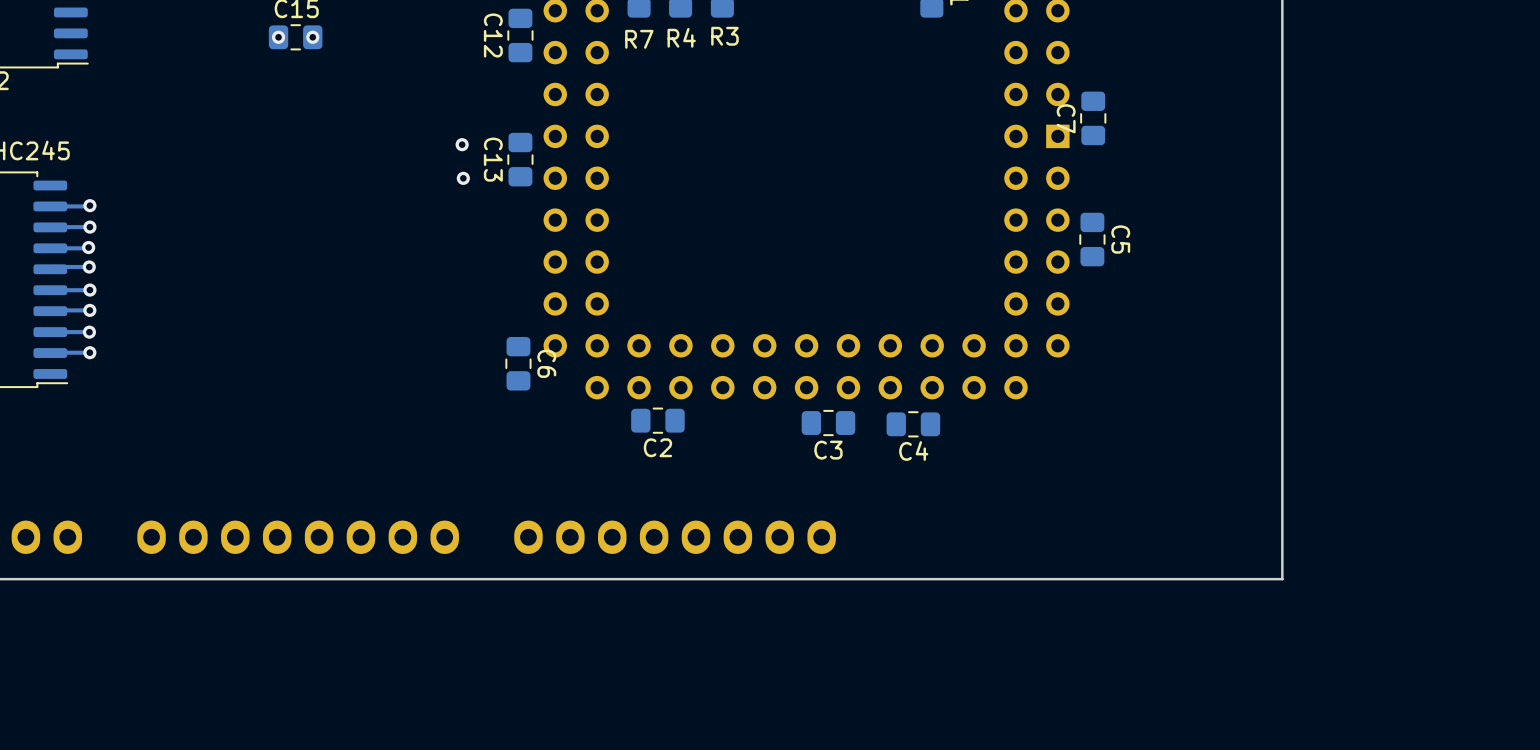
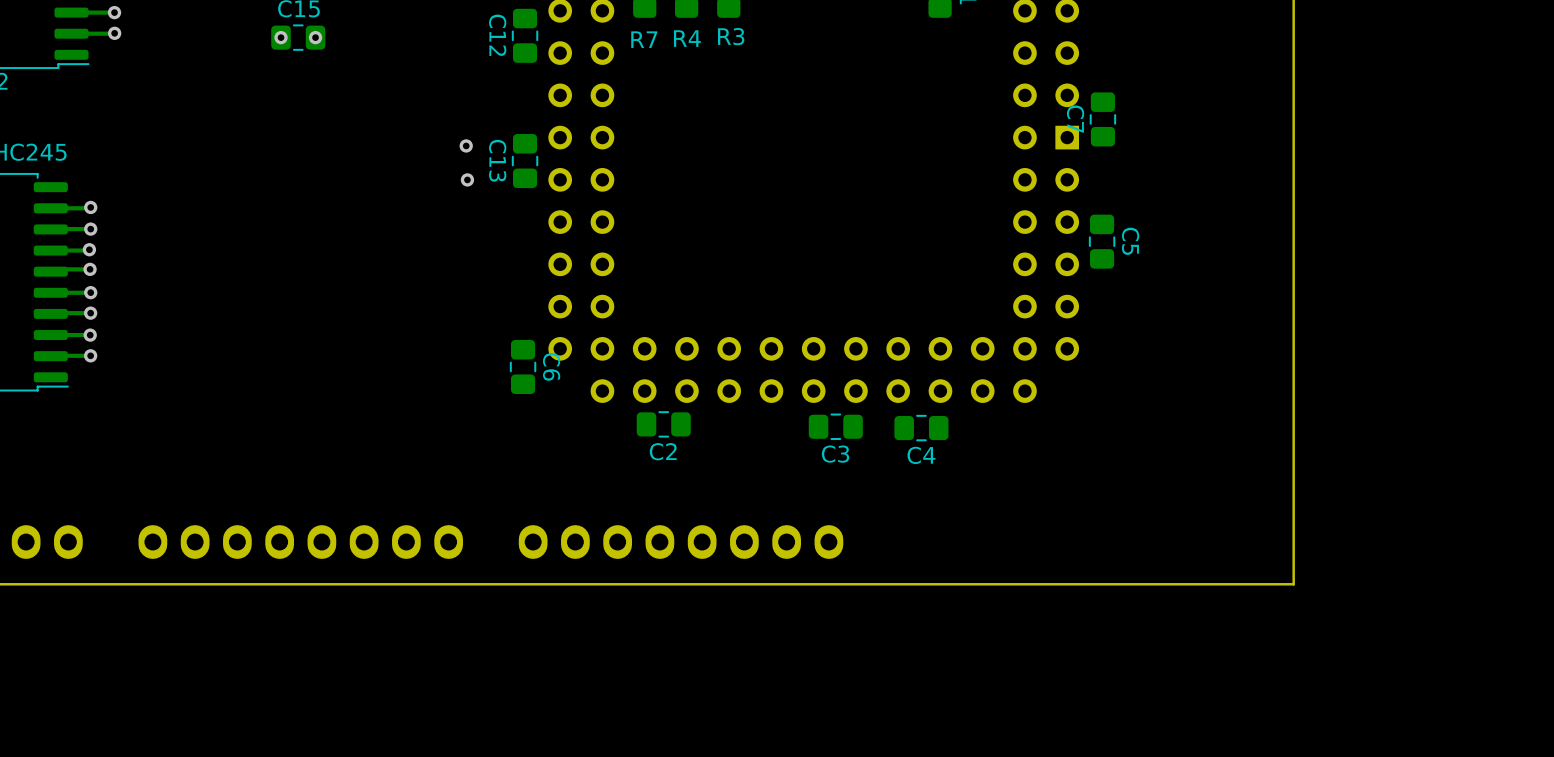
track: none -> (114, 12) (71, 12)
via: none -> (114, 12)
track: none -> (114, 33) (71, 33)
via: none -> (114, 33)

